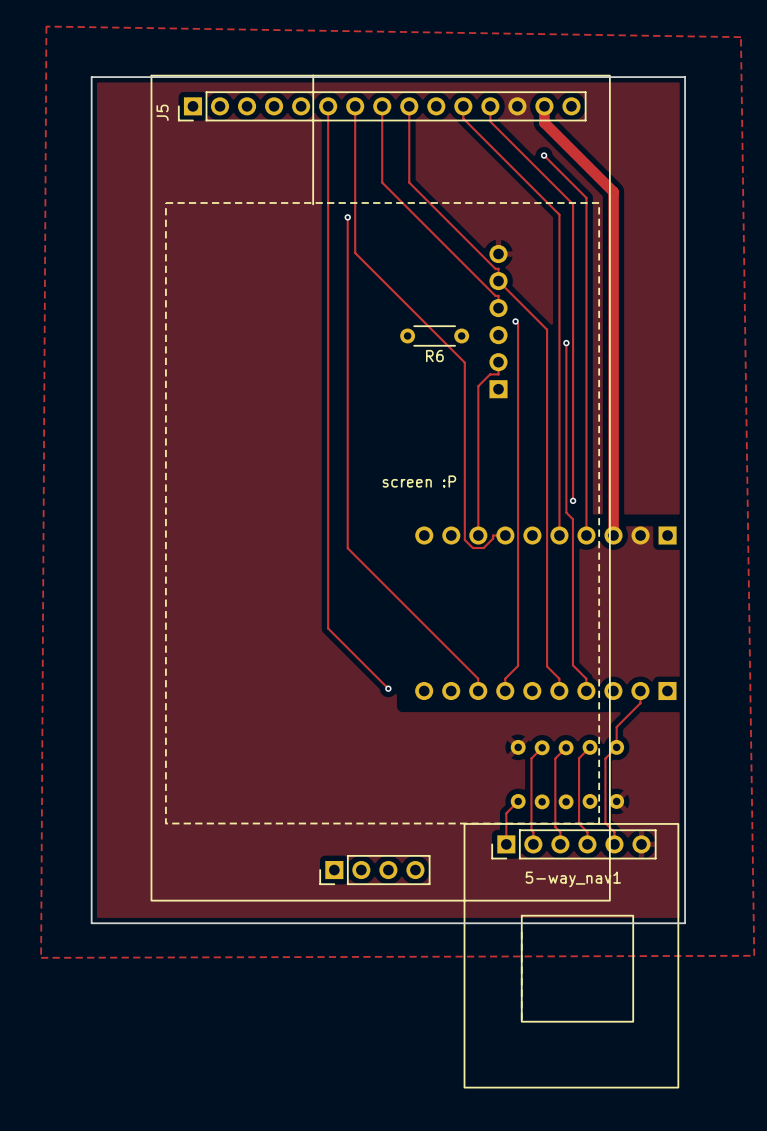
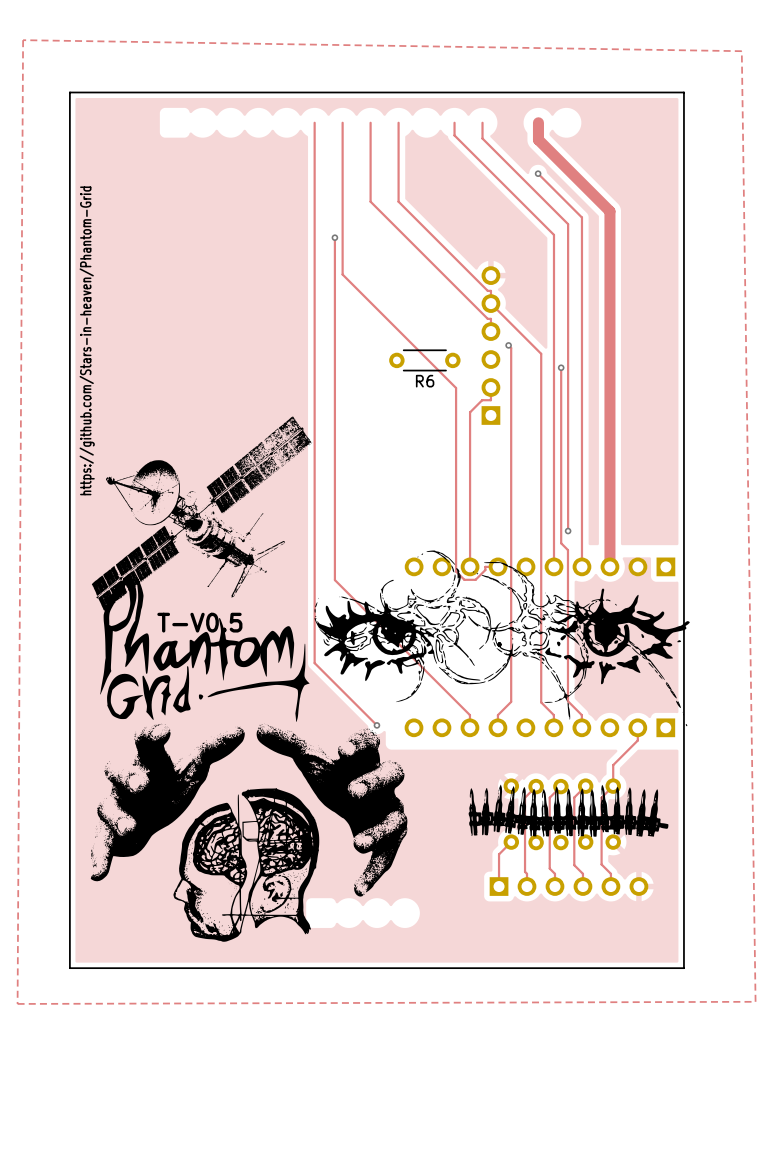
text: none -> https://github.com/Stars-in-heaven/Phantom-Grid (87, 340)
drawing: none -> [90, 416, 408, 942]
J5: (380, 488) -> none
text: none -> T-V0.5 (199, 622)
part: none -> (502, 638)
drawing: none -> [468, 784, 669, 837]
part: none -> (568, 886)
5-way_nav1: (571, 955) -> none

